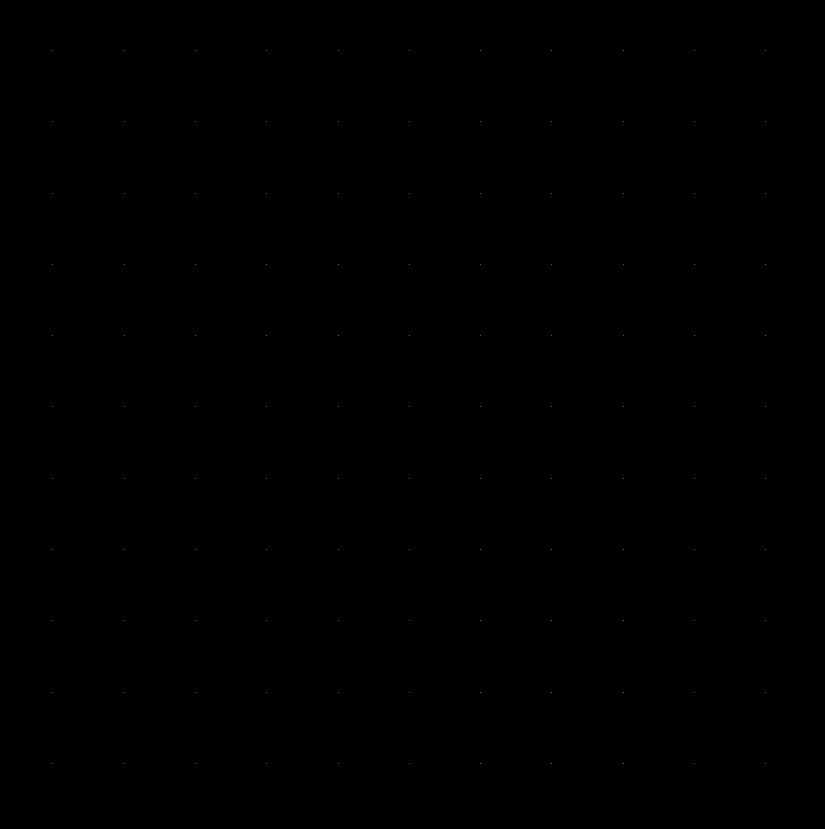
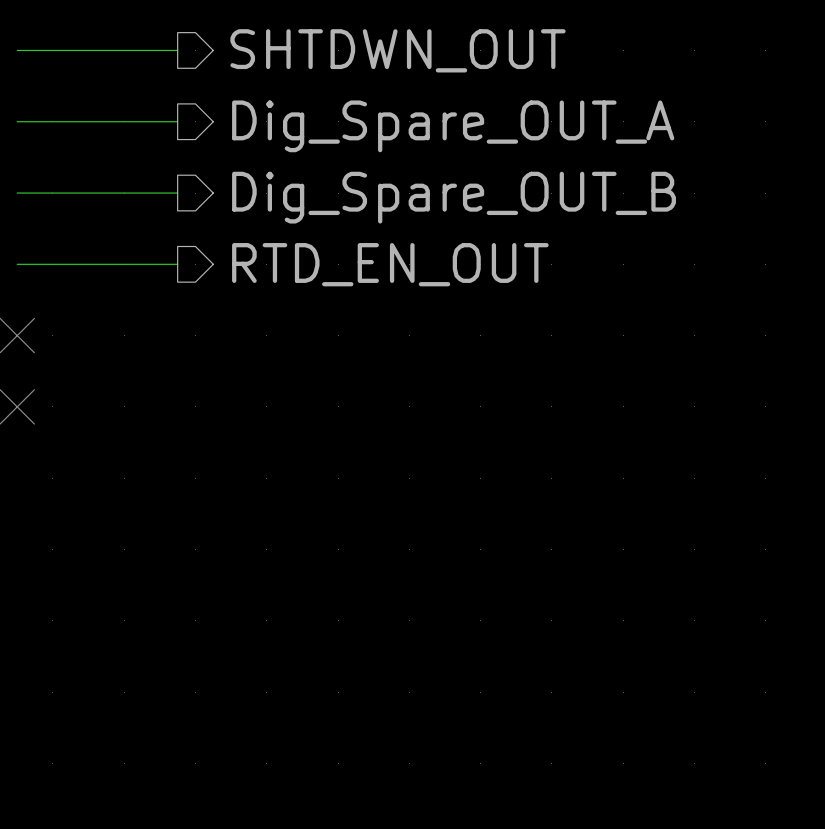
wire: none -> (17, 50) (177, 50)
hierarchical label: none -> SHTDWN_OUT (398, 50)
wire: none -> (17, 121) (177, 121)
hierarchical label: none -> Dig_Spare_OUT_A (453, 126)
wire: none -> (17, 193) (177, 193)
hierarchical label: none -> Dig_Spare_OUT_B (454, 197)
wire: none -> (17, 264) (177, 264)
hierarchical label: none -> RTD_EN_OUT (390, 264)
no-connect mark: none -> (17, 335)
no-connect mark: none -> (17, 406)

